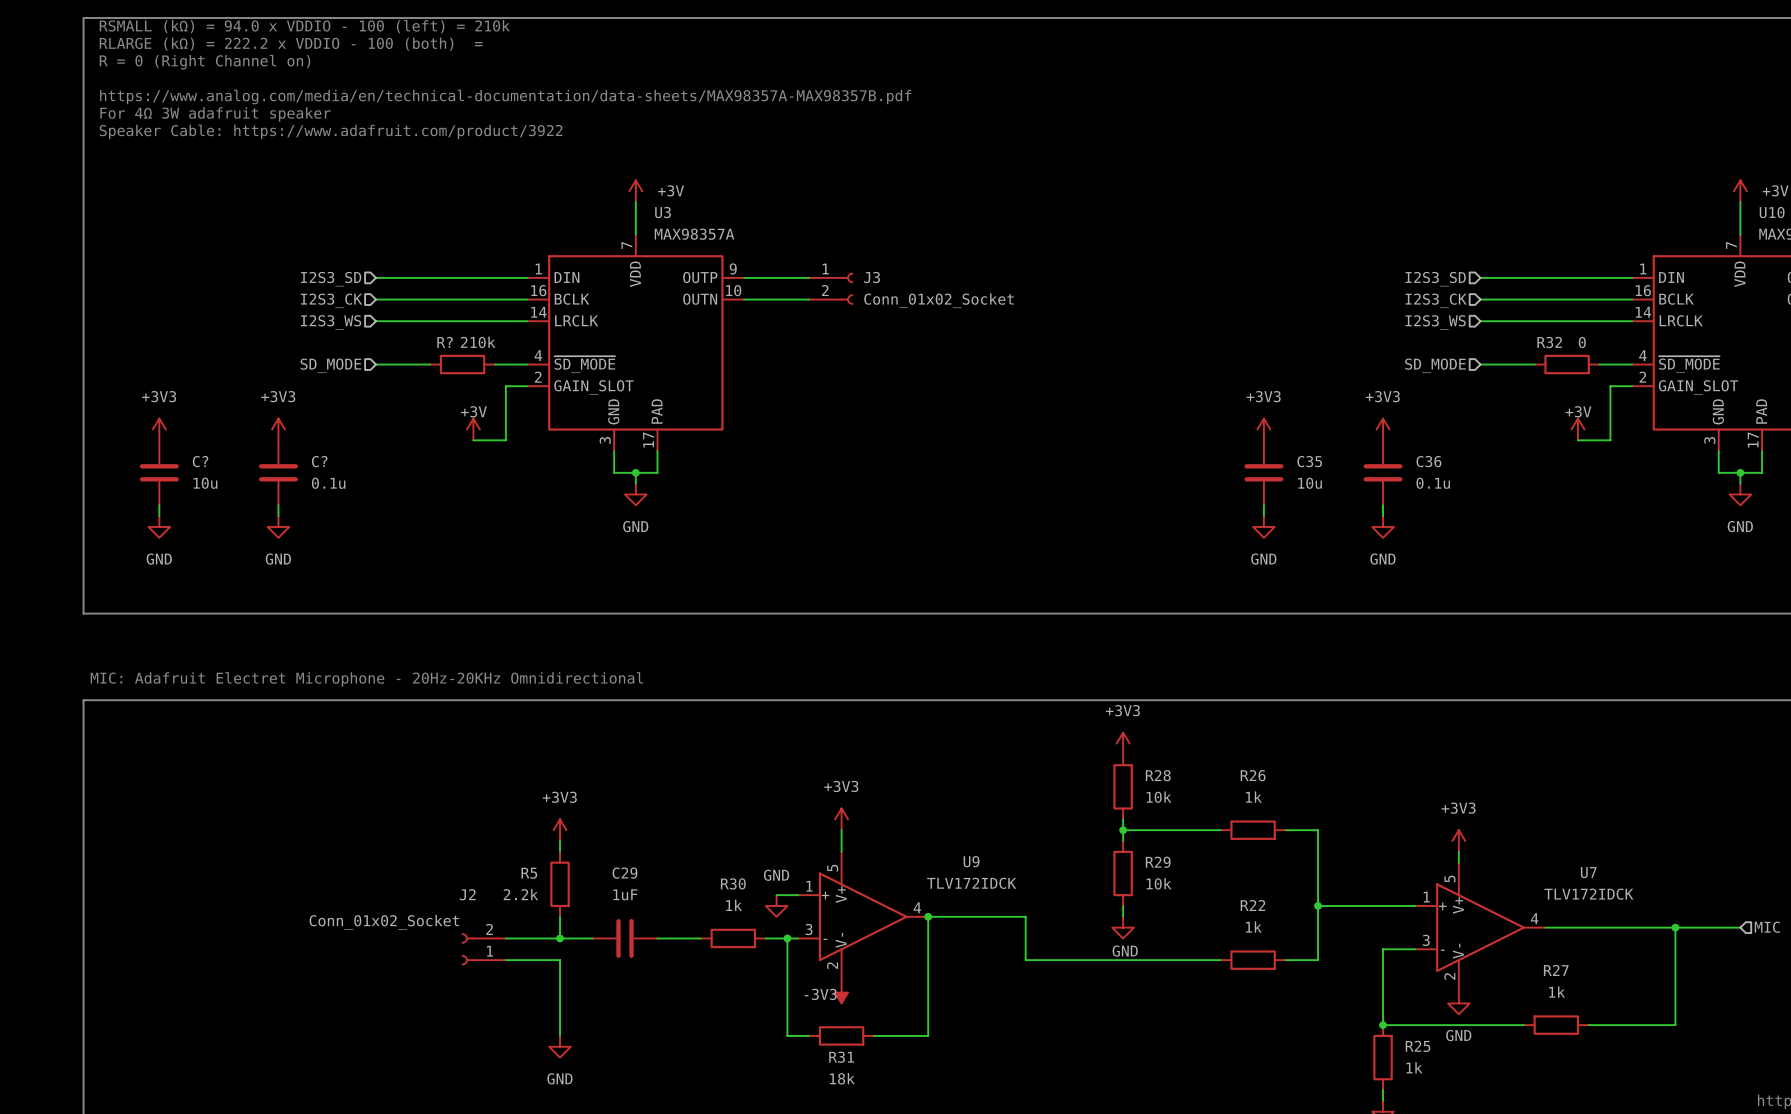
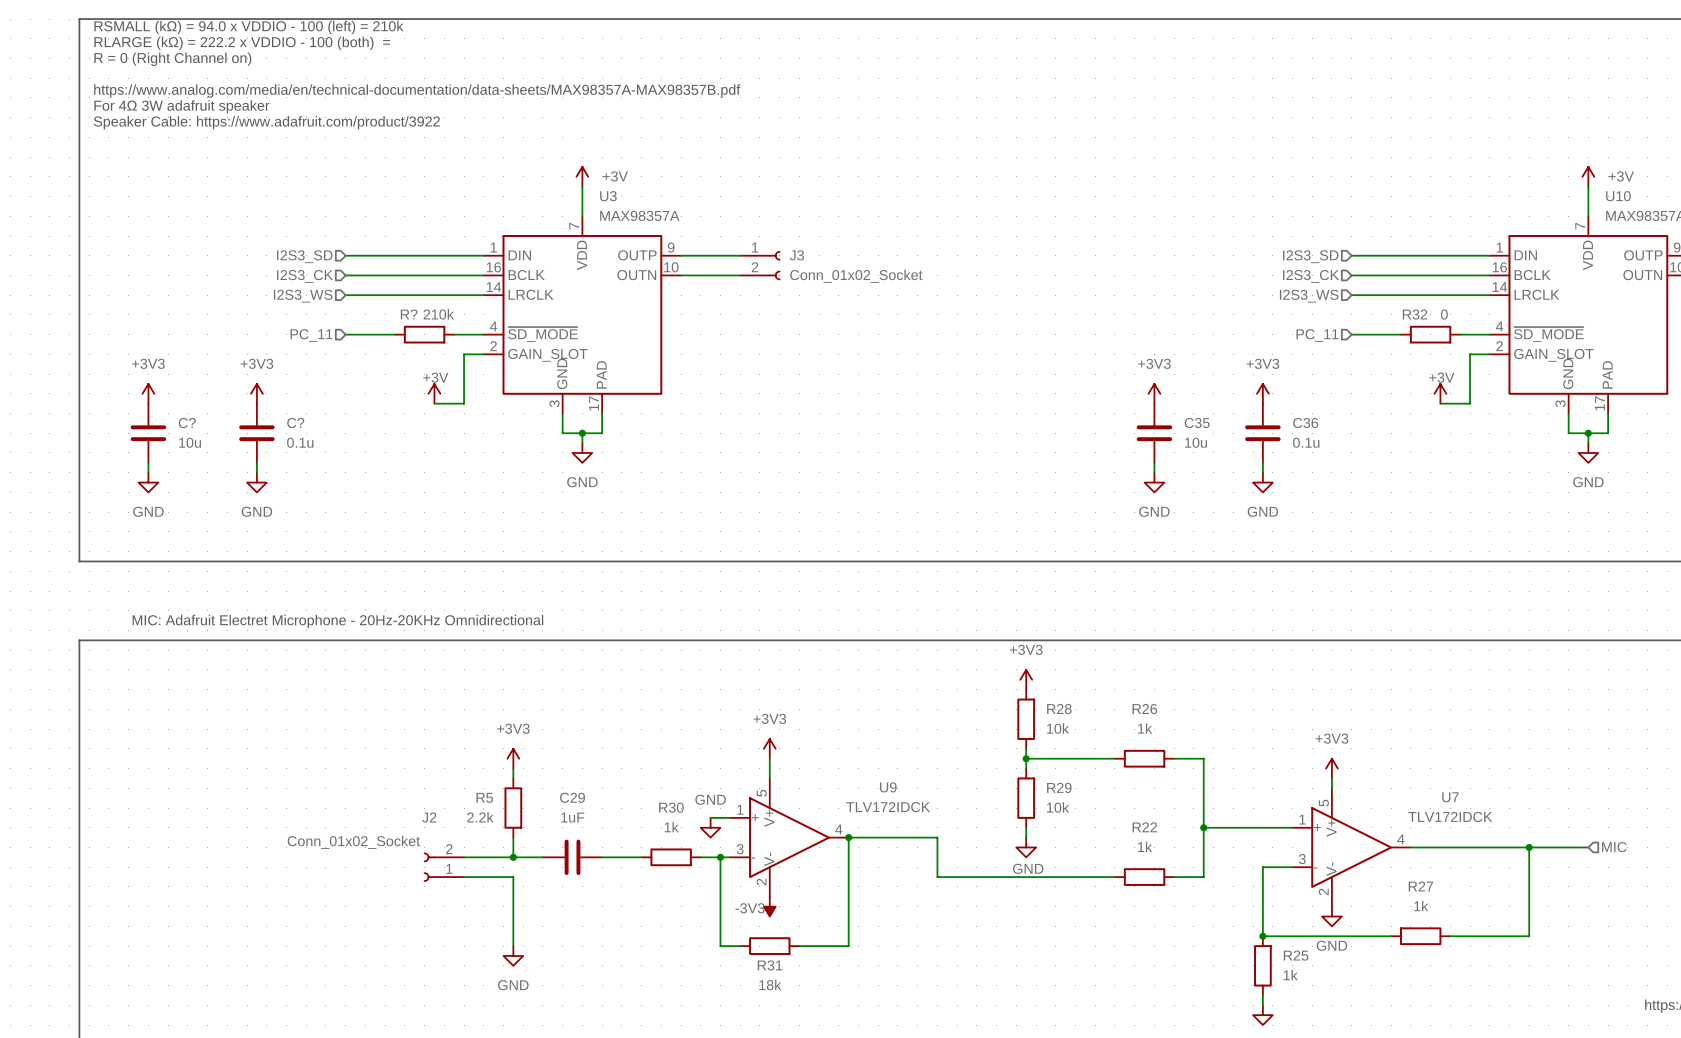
hierarchical label: SD_MODE (330, 365) -> PC_11 (311, 335)
hierarchical label: SD_MODE (1435, 365) -> PC_11 (1317, 335)

